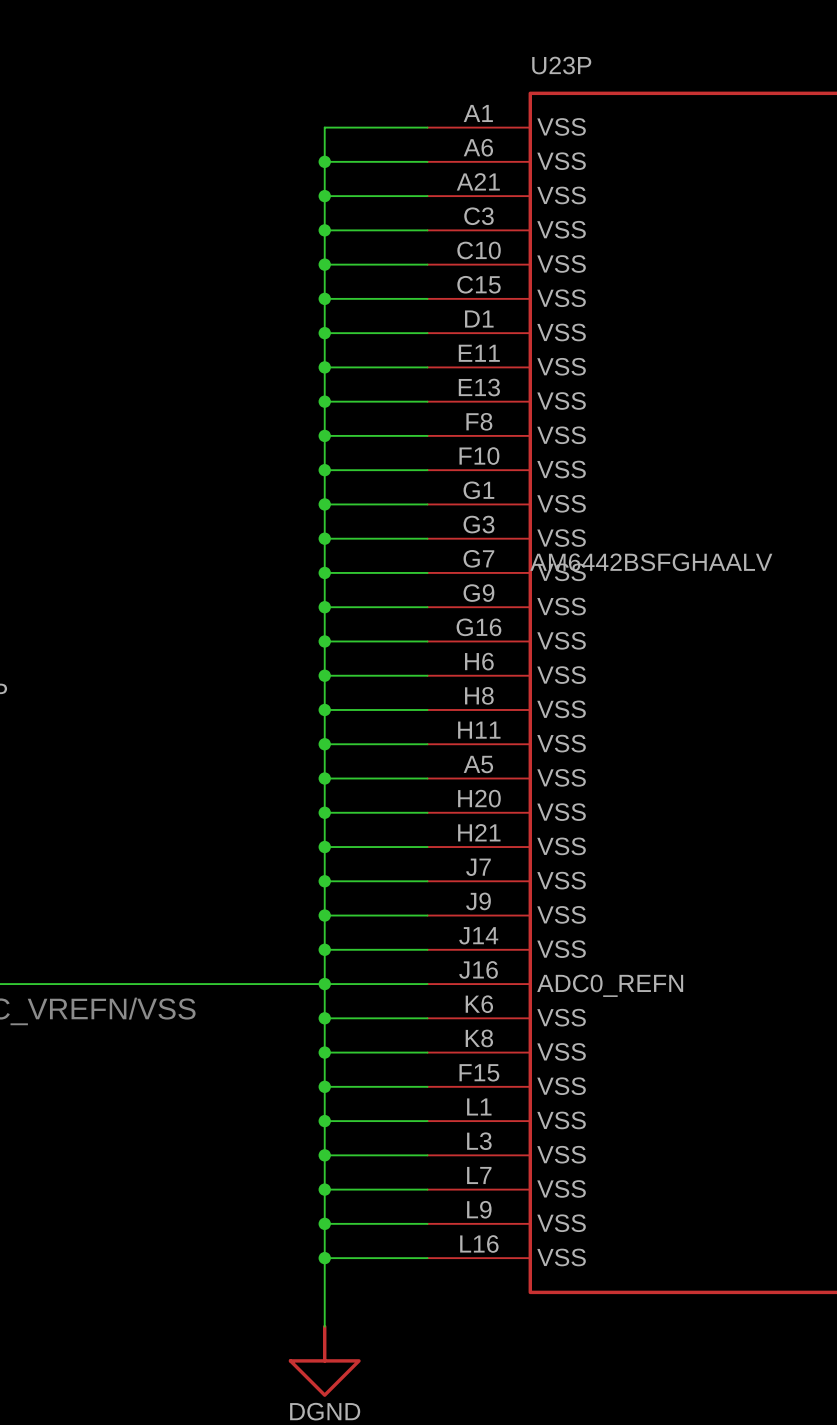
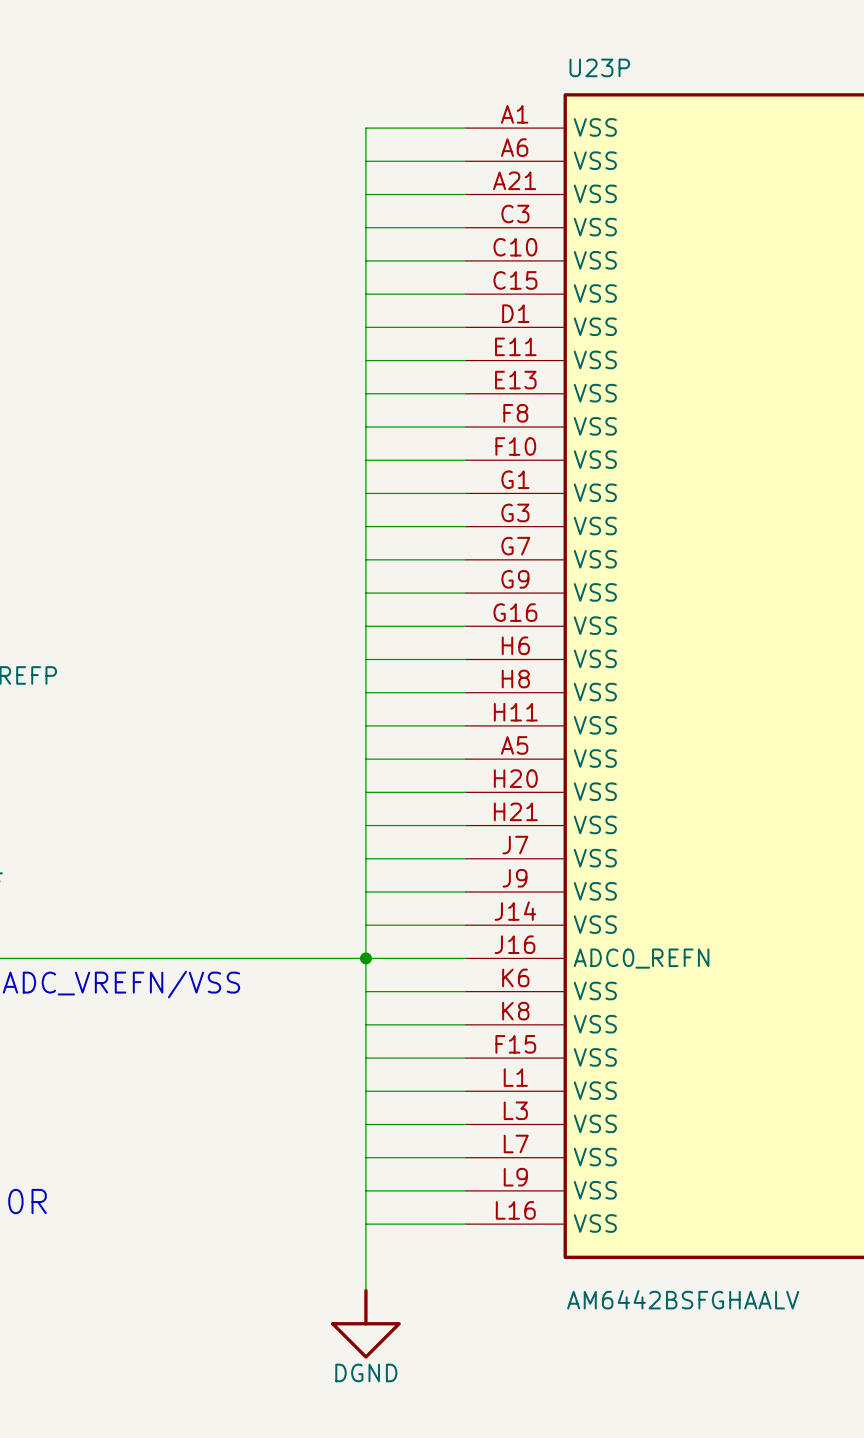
junction: (324, 161) -> none
junction: (324, 196) -> none
junction: (324, 230) -> none
junction: (324, 264) -> none
junction: (324, 298) -> none
junction: (324, 333) -> none
junction: (324, 367) -> none
junction: (324, 401) -> none
junction: (324, 435) -> none
junction: (324, 470) -> none
junction: (324, 504) -> none
junction: (324, 538) -> none
U23P value position: AM6442BSFGHAALV (651, 562) -> AM6442BSFGHAALV (683, 1299)
junction: (324, 572) -> none
junction: (324, 607) -> none
junction: (324, 641) -> none
junction: (324, 675) -> none
junction: (324, 709) -> none
junction: (324, 744) -> none
junction: (324, 778) -> none
junction: (324, 812) -> none
junction: (324, 847) -> none
junction: (324, 881) -> none
junction: (324, 915) -> none
junction: (324, 949) -> none
junction: (324, 1018) -> none
junction: (324, 1052) -> none
junction: (324, 1086) -> none
junction: (324, 1121) -> none
junction: (324, 1155) -> none
junction: (324, 1189) -> none
junction: (324, 1223) -> none
junction: (324, 1258) -> none

